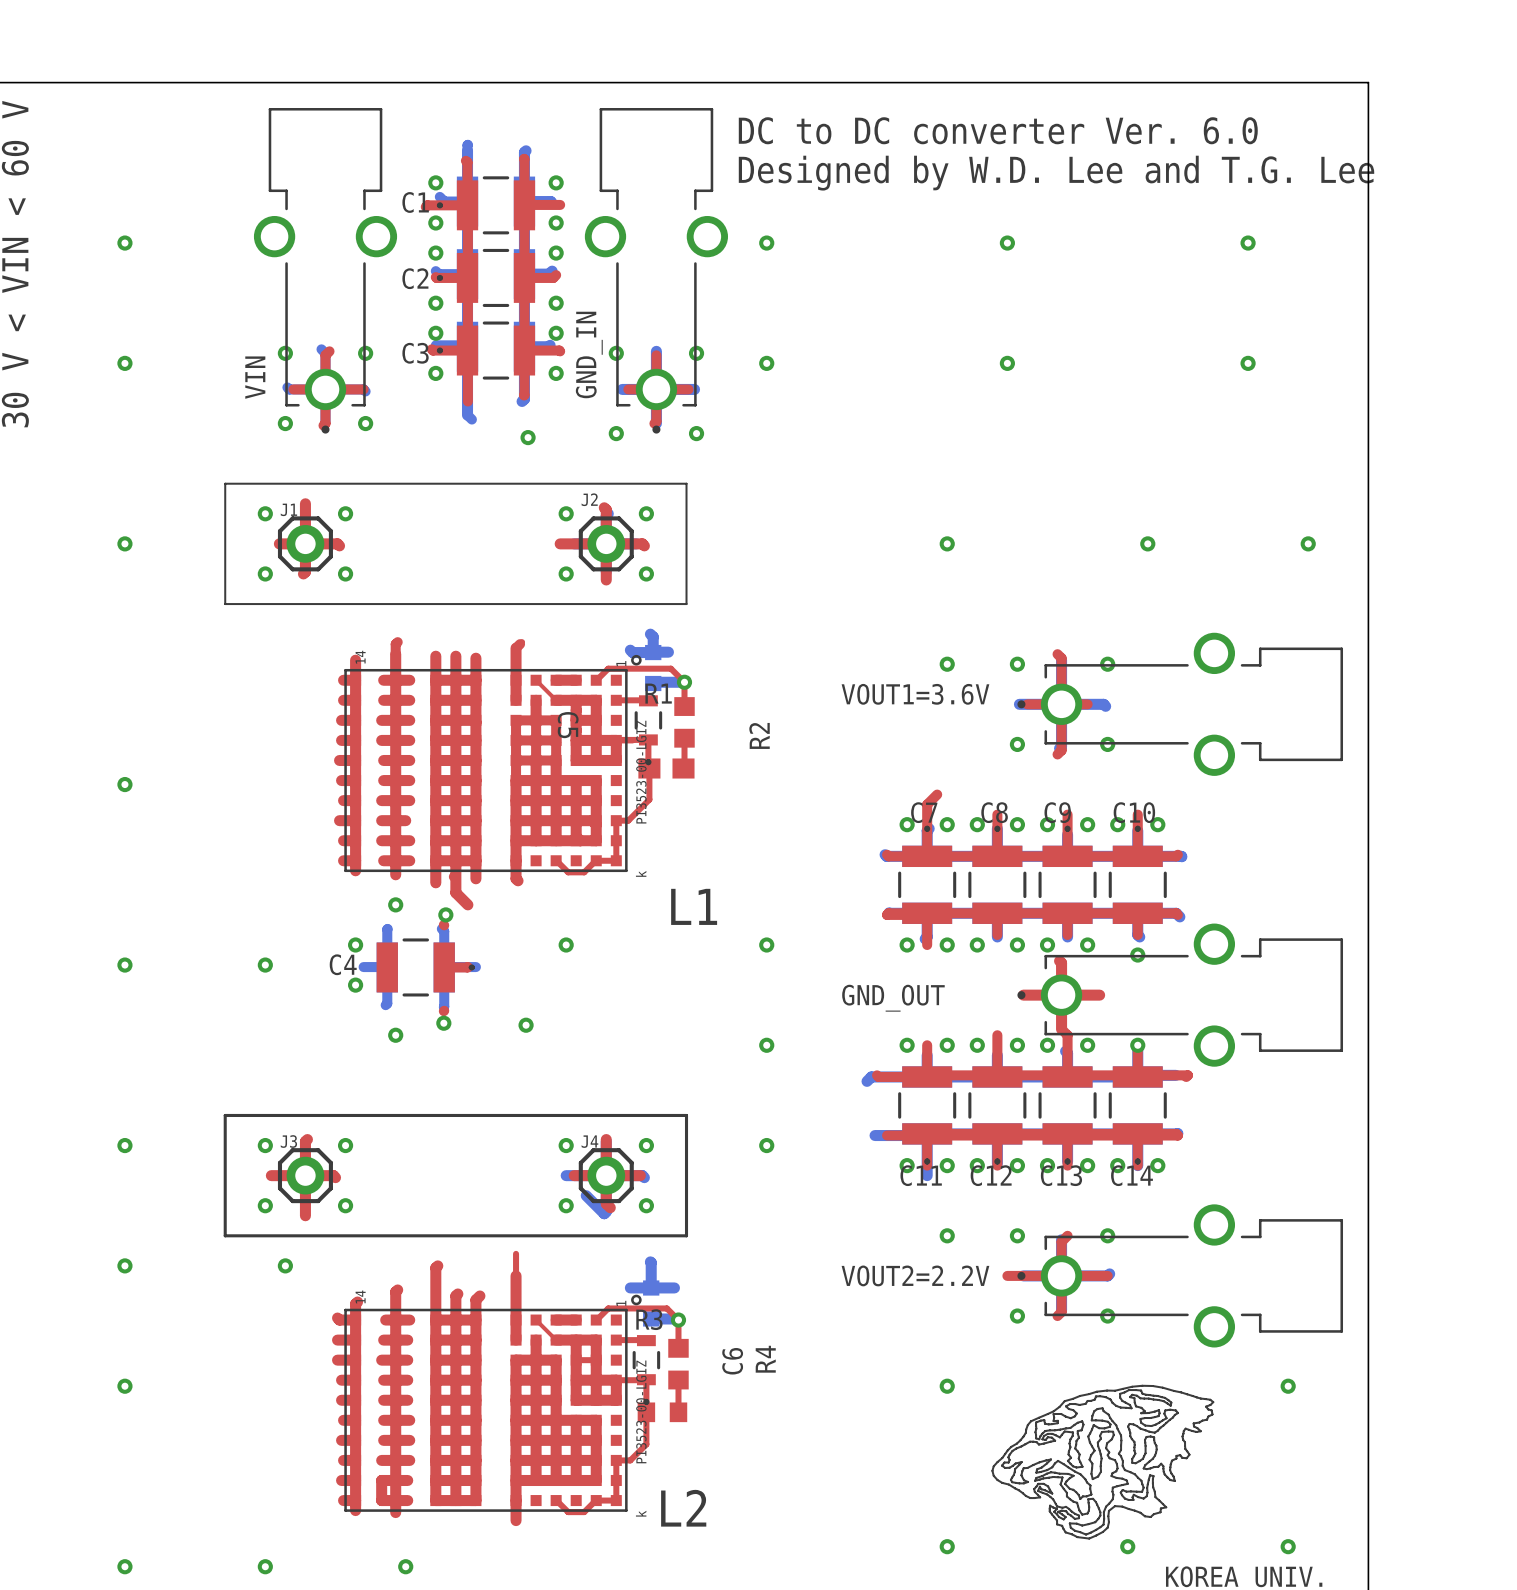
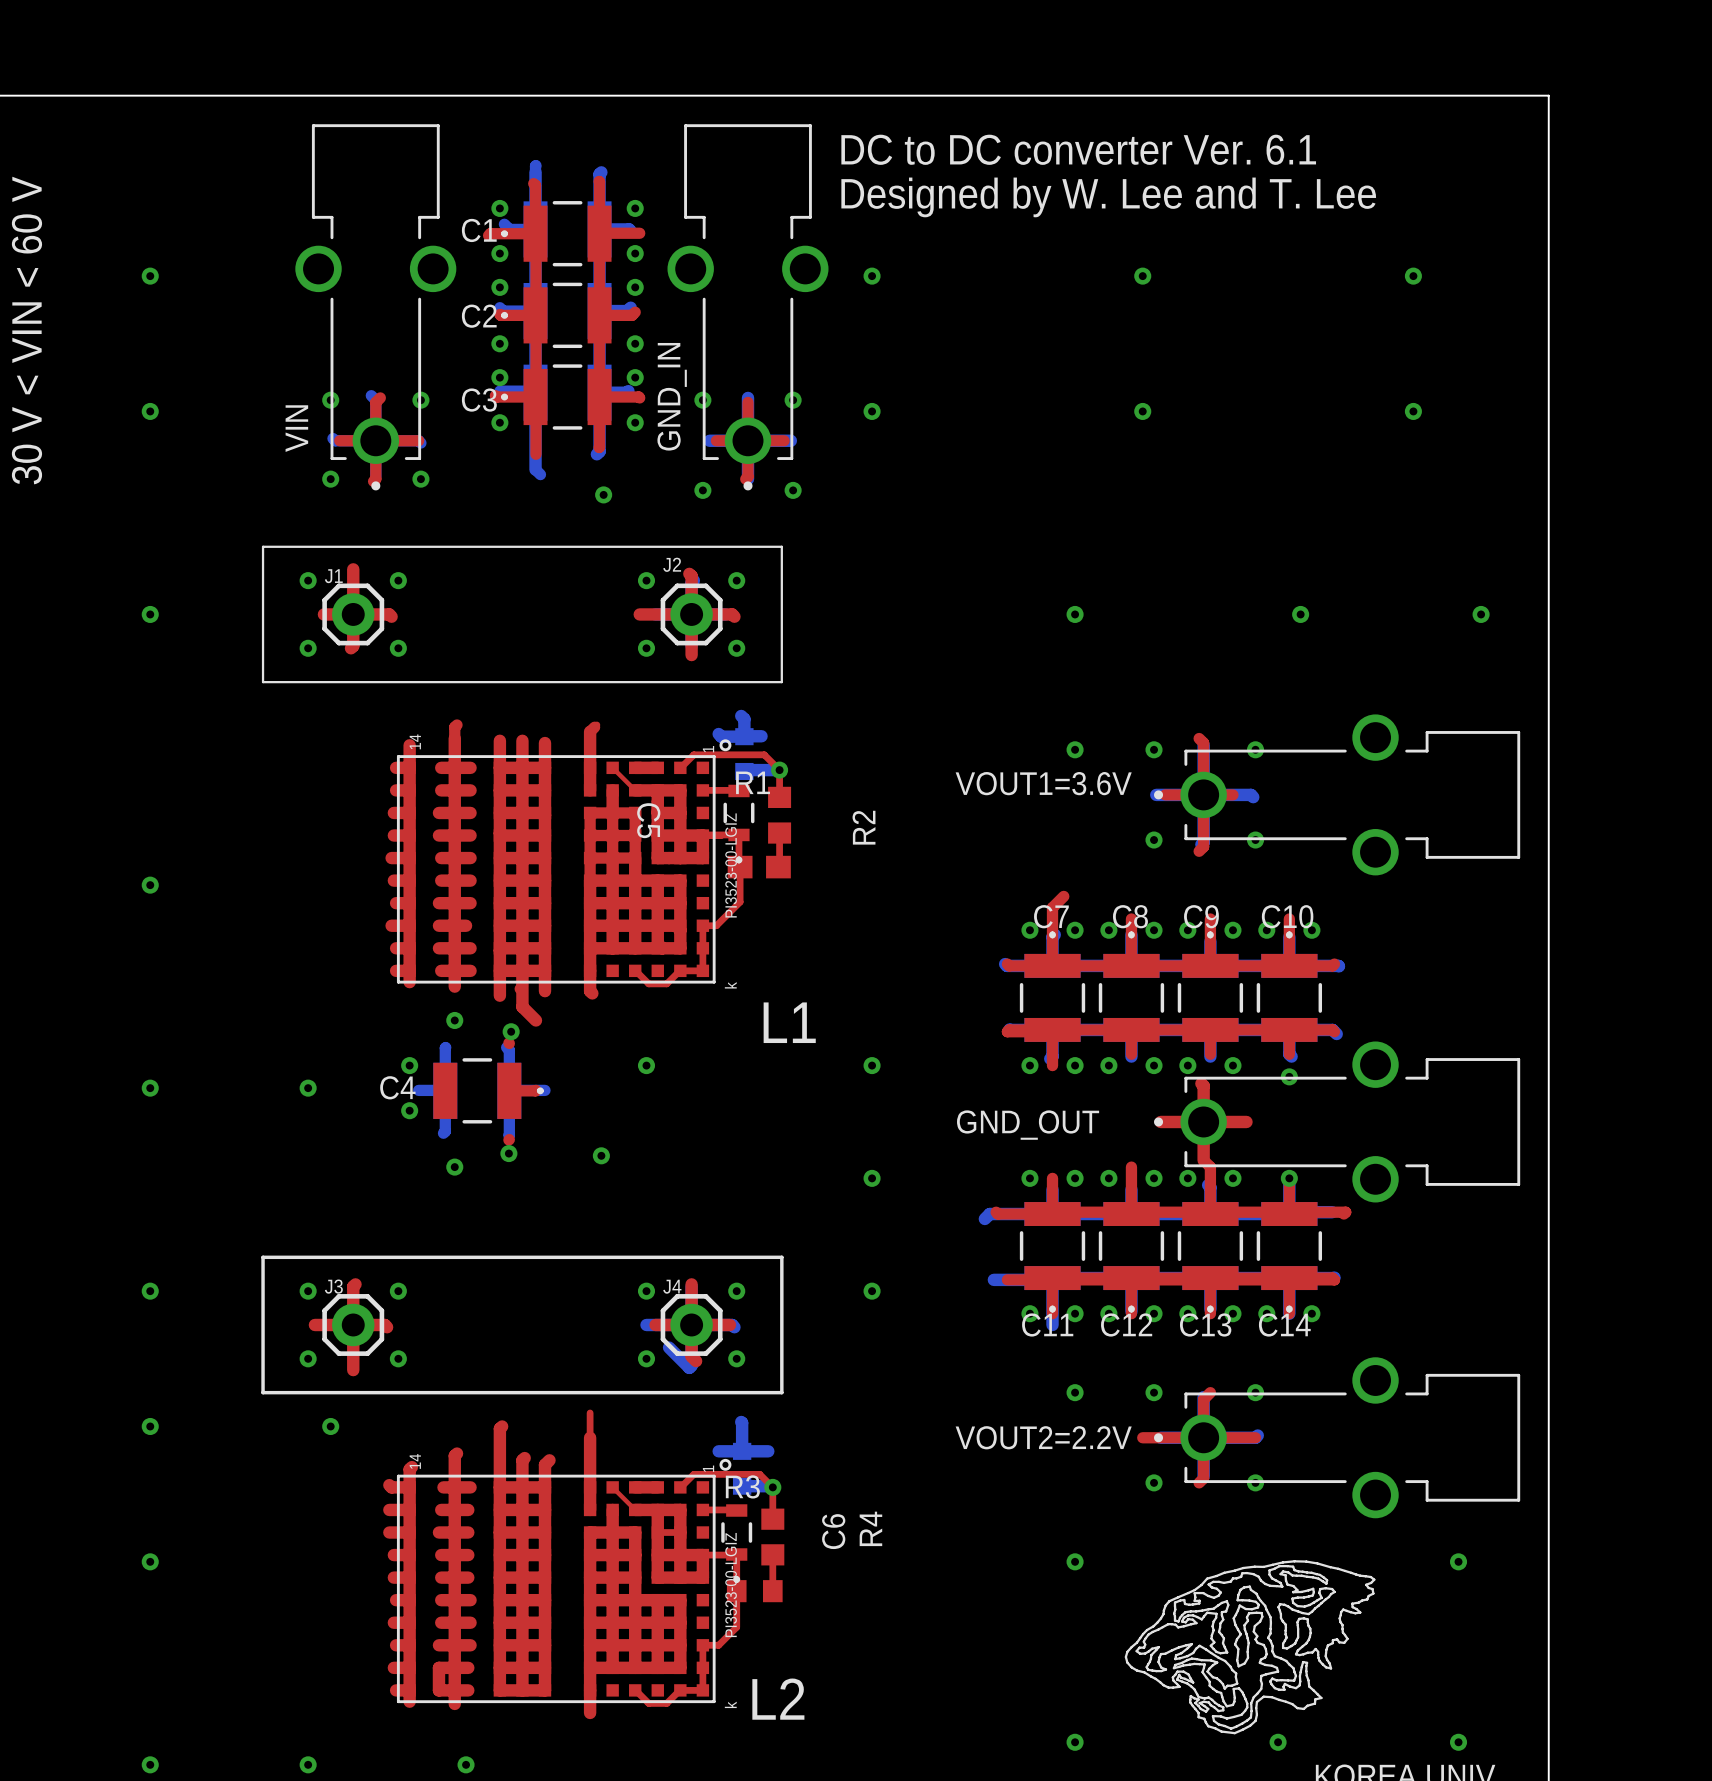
text: DC to DC converter Ver. 6.0 (998, 130) -> DC to DC converter Ver. 6.1 (1078, 149)
text: Designed by W.D. Lee and T.G. Lee (1056, 173) -> Designed by W. Lee and T. Lee (1108, 197)

